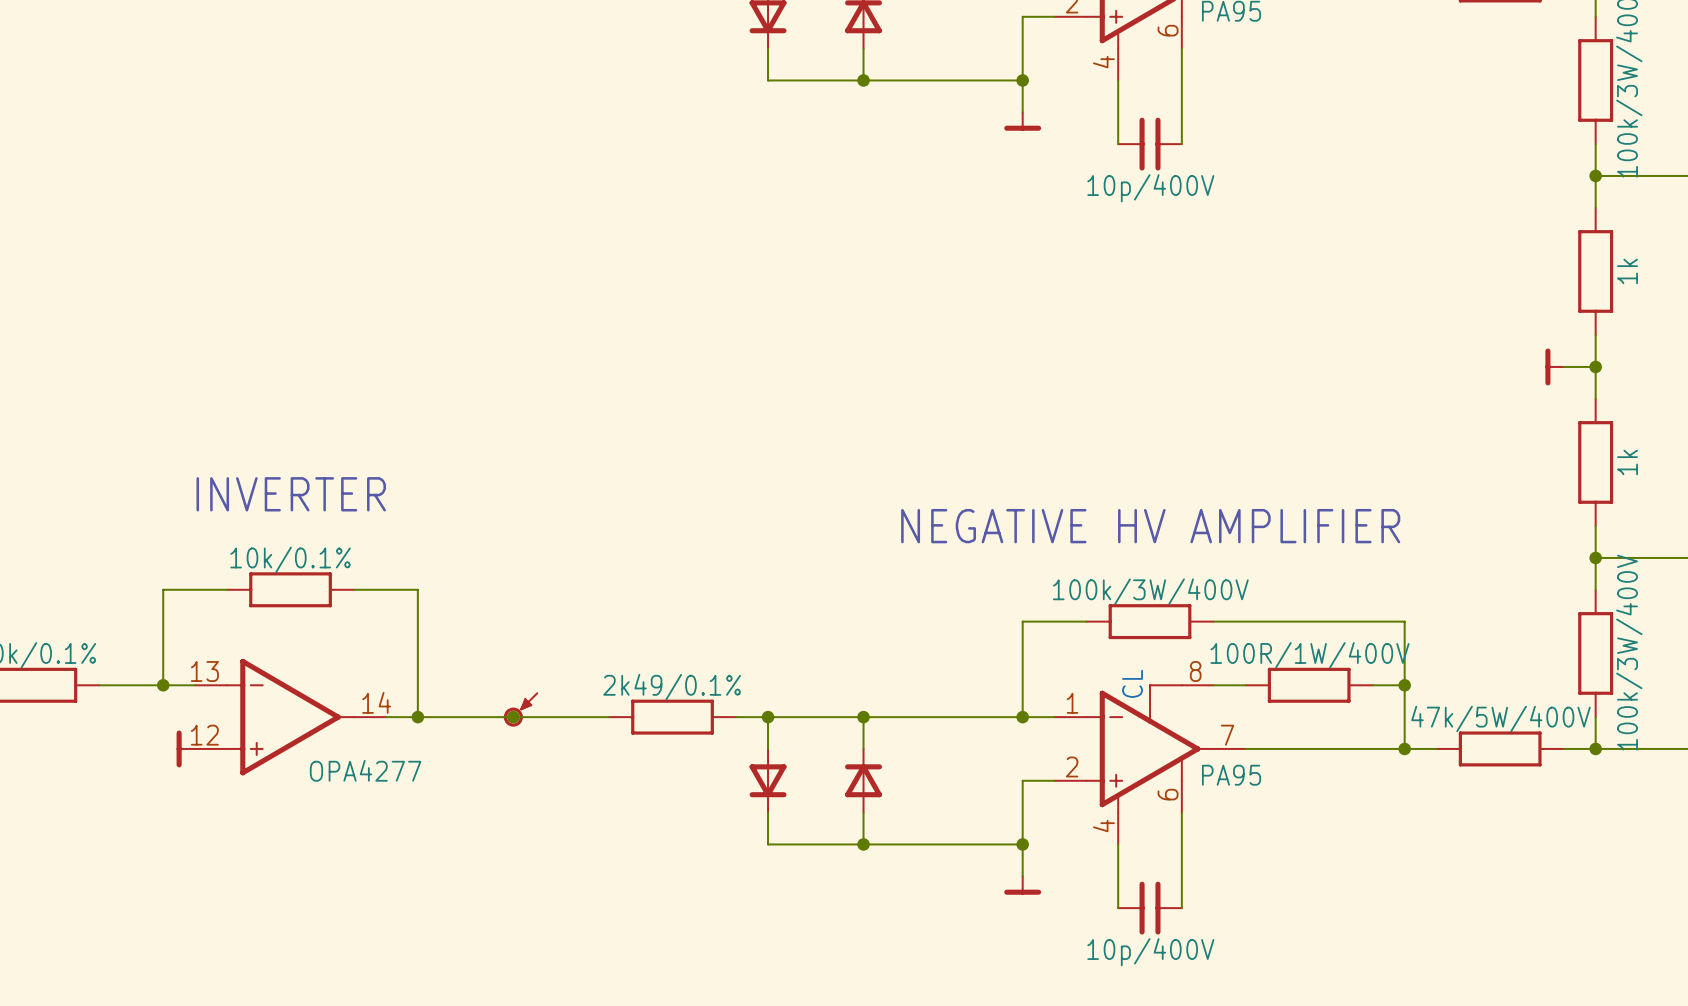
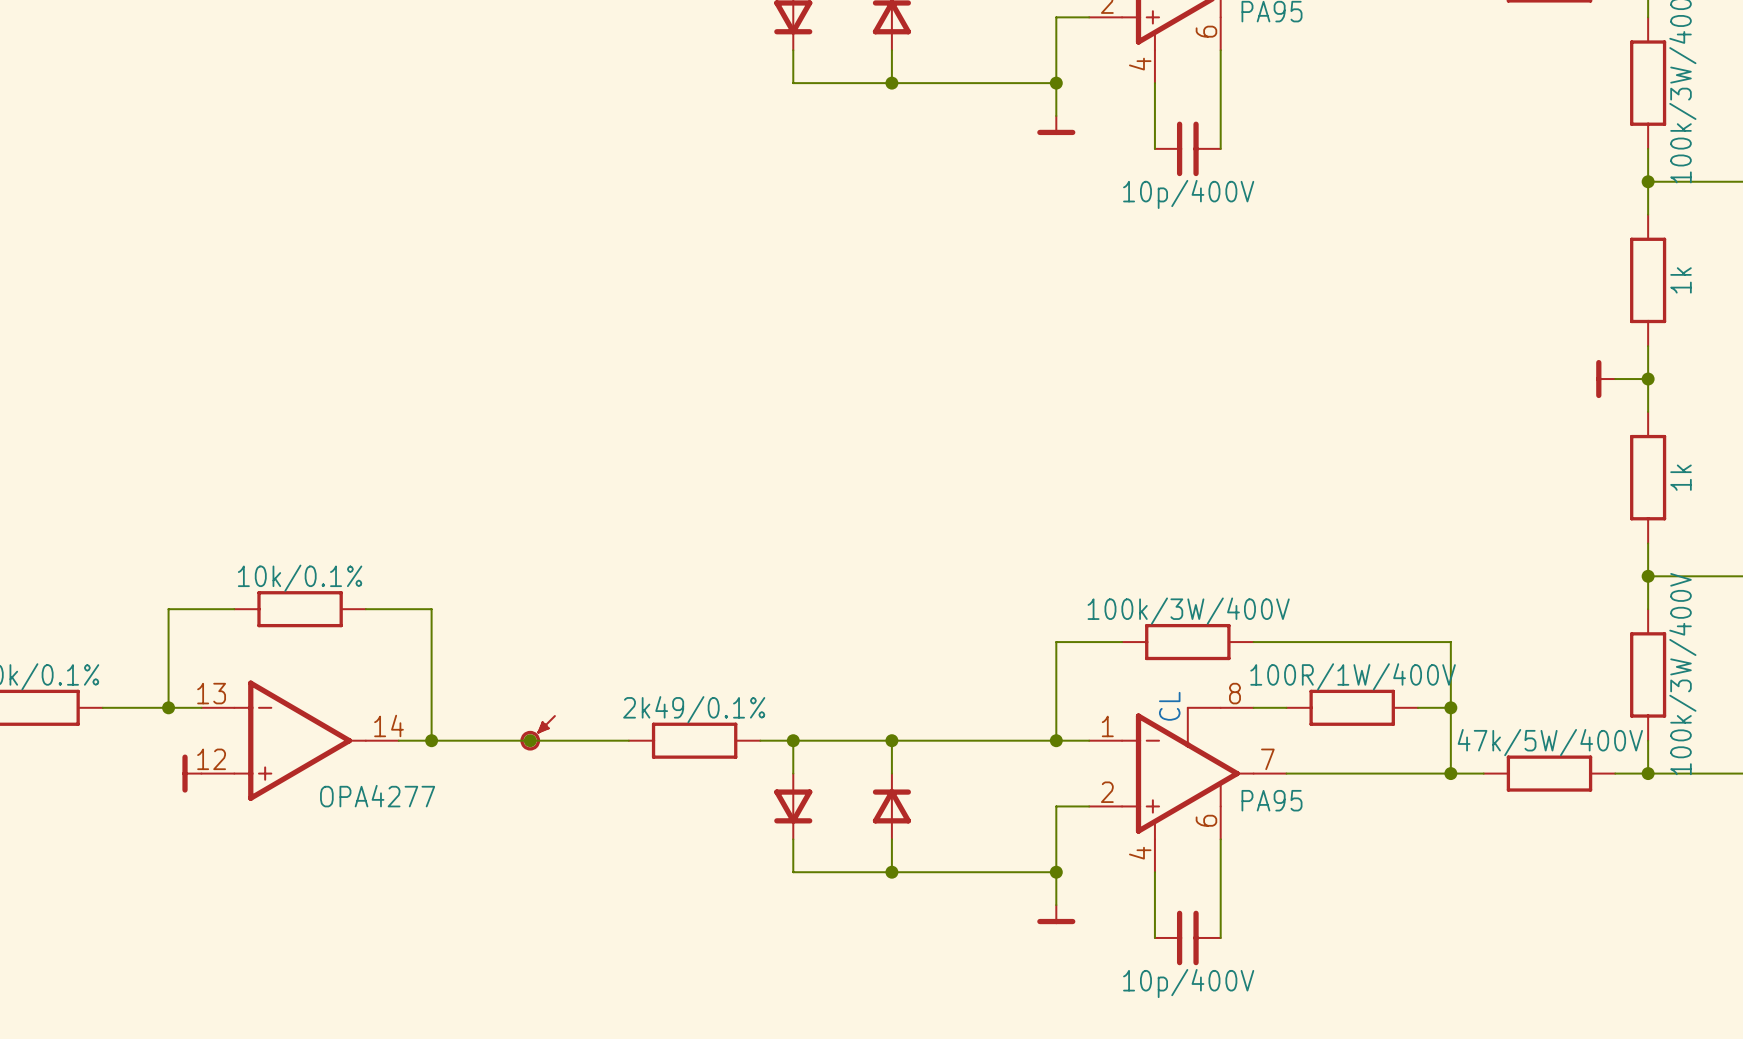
text: INVERTER (291, 494) -> none
text: NEGATIVE HV AMPLIFIER (1150, 526) -> none

